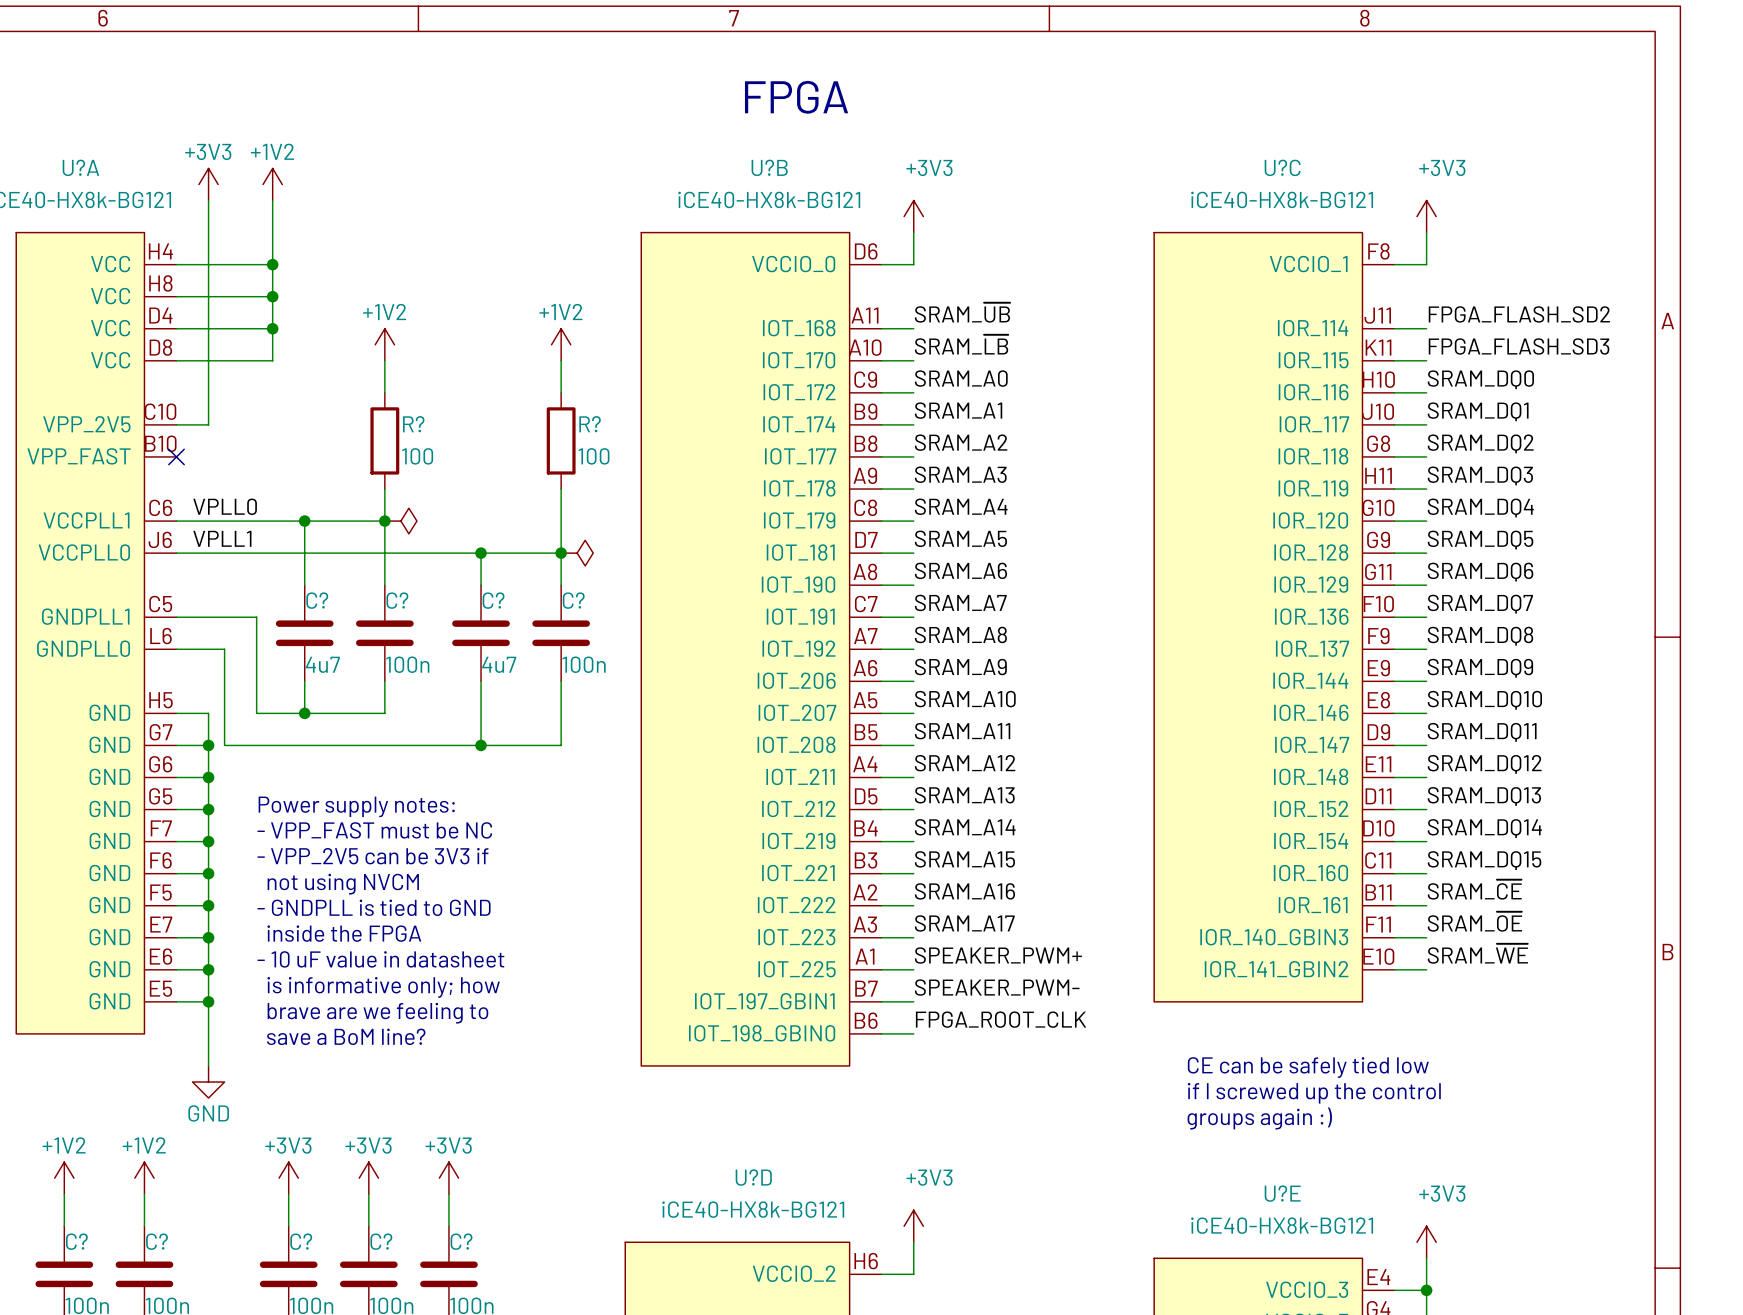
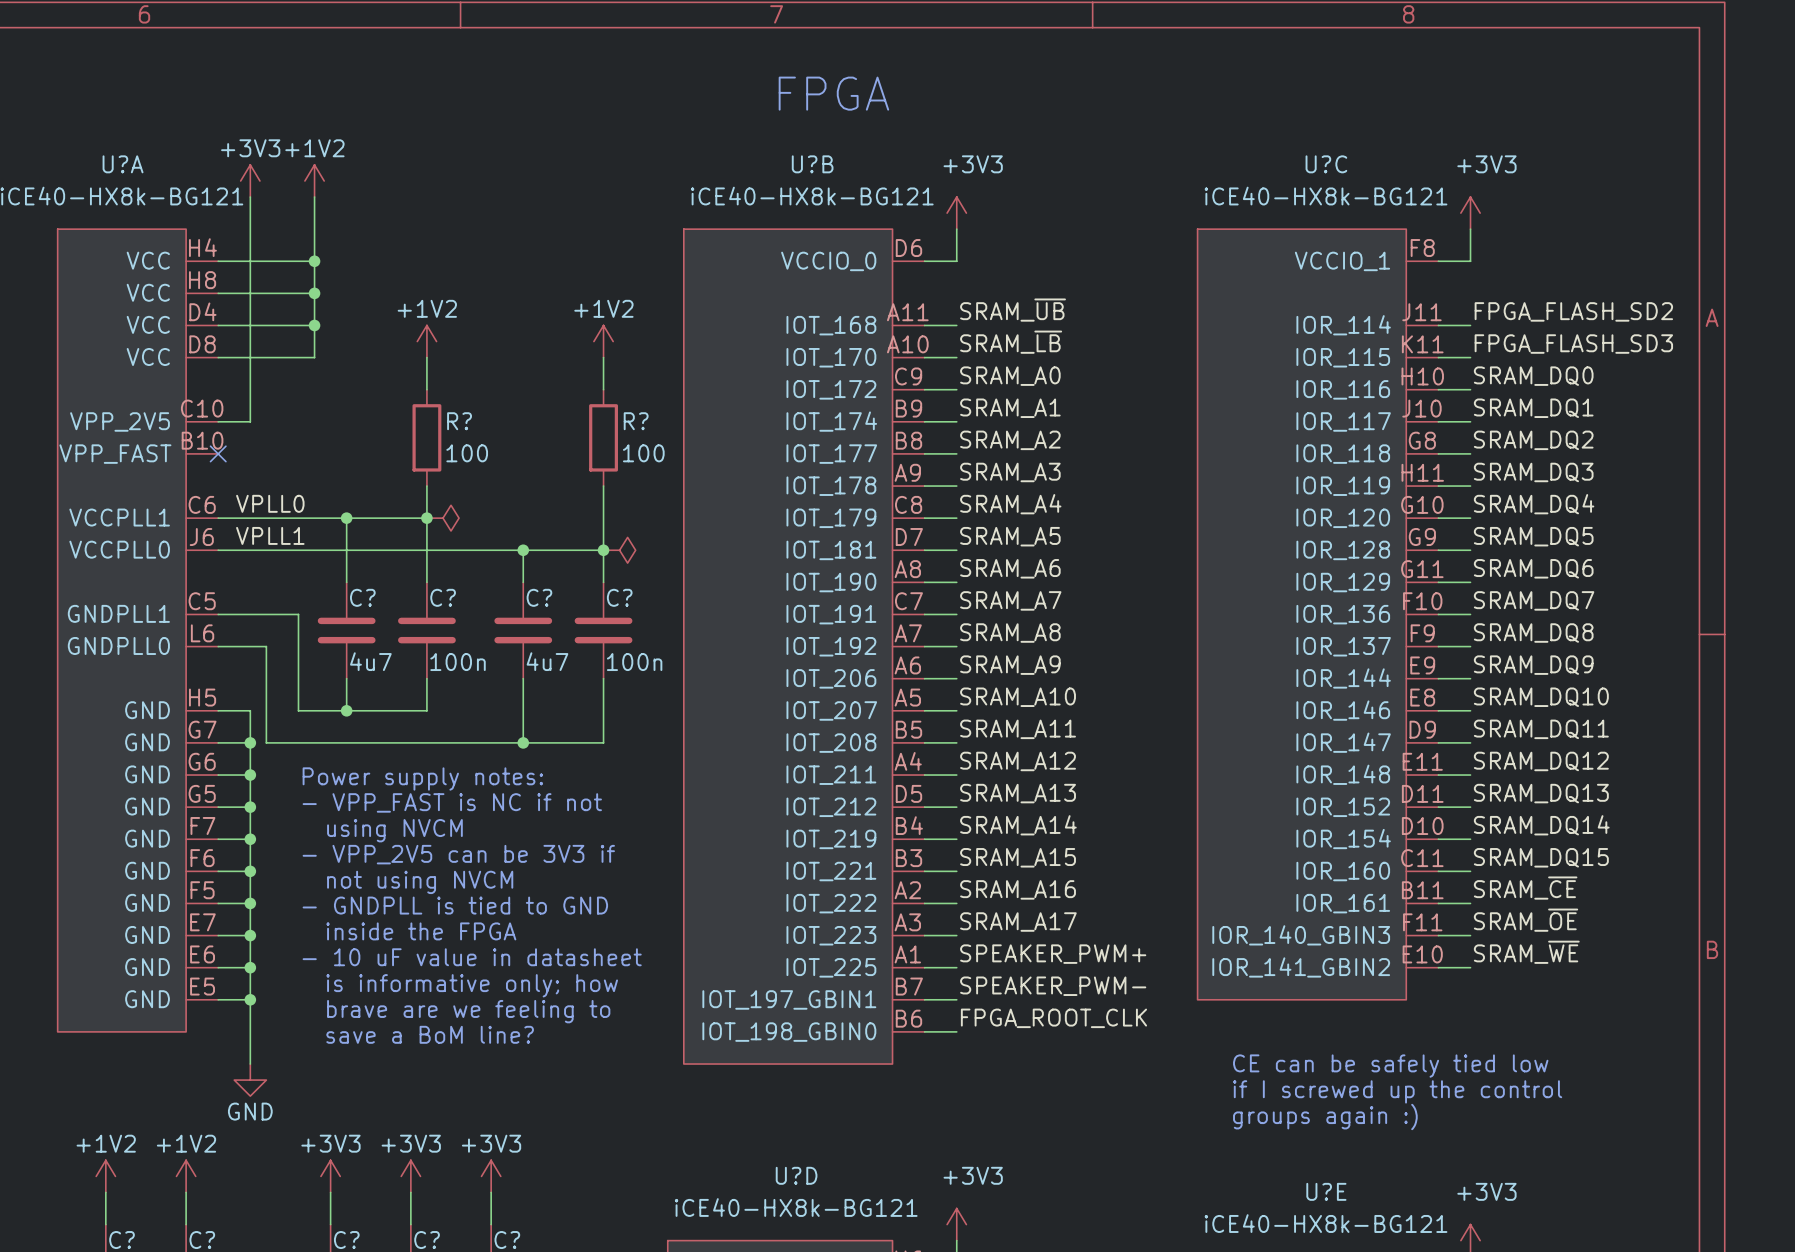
text: none -> Power supply notes: (422, 778)
text: Power supply notes: (356, 806) -> - VPP_FAST is NC if not (452, 802)
text: - VPP_FAST must be NC (374, 830) -> using NVCM (394, 830)

